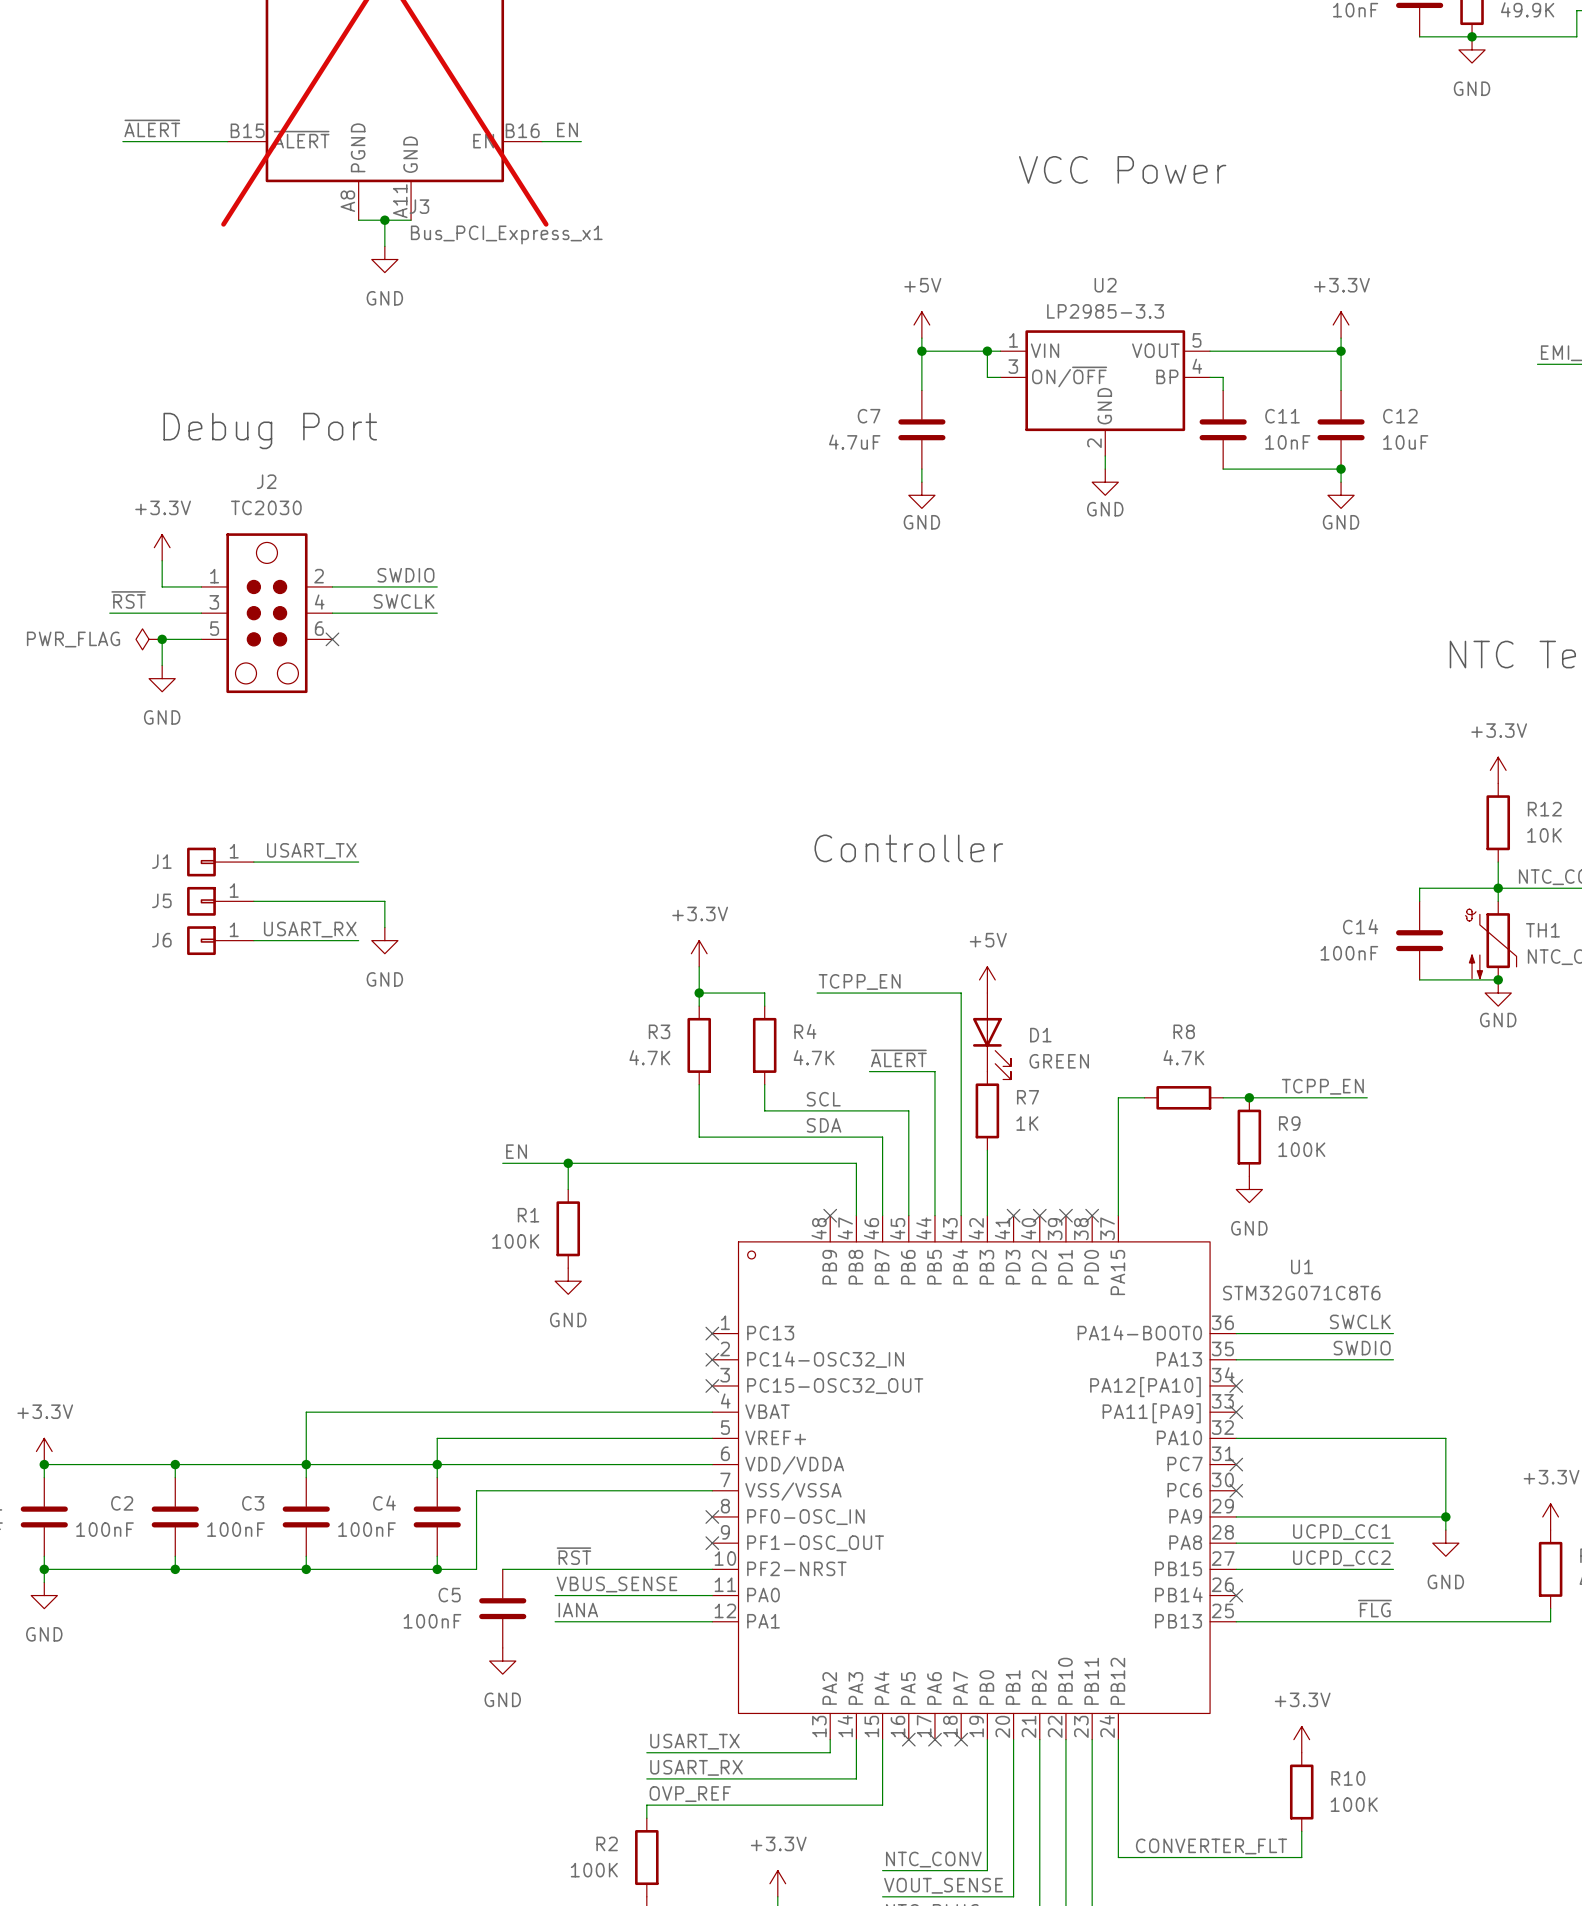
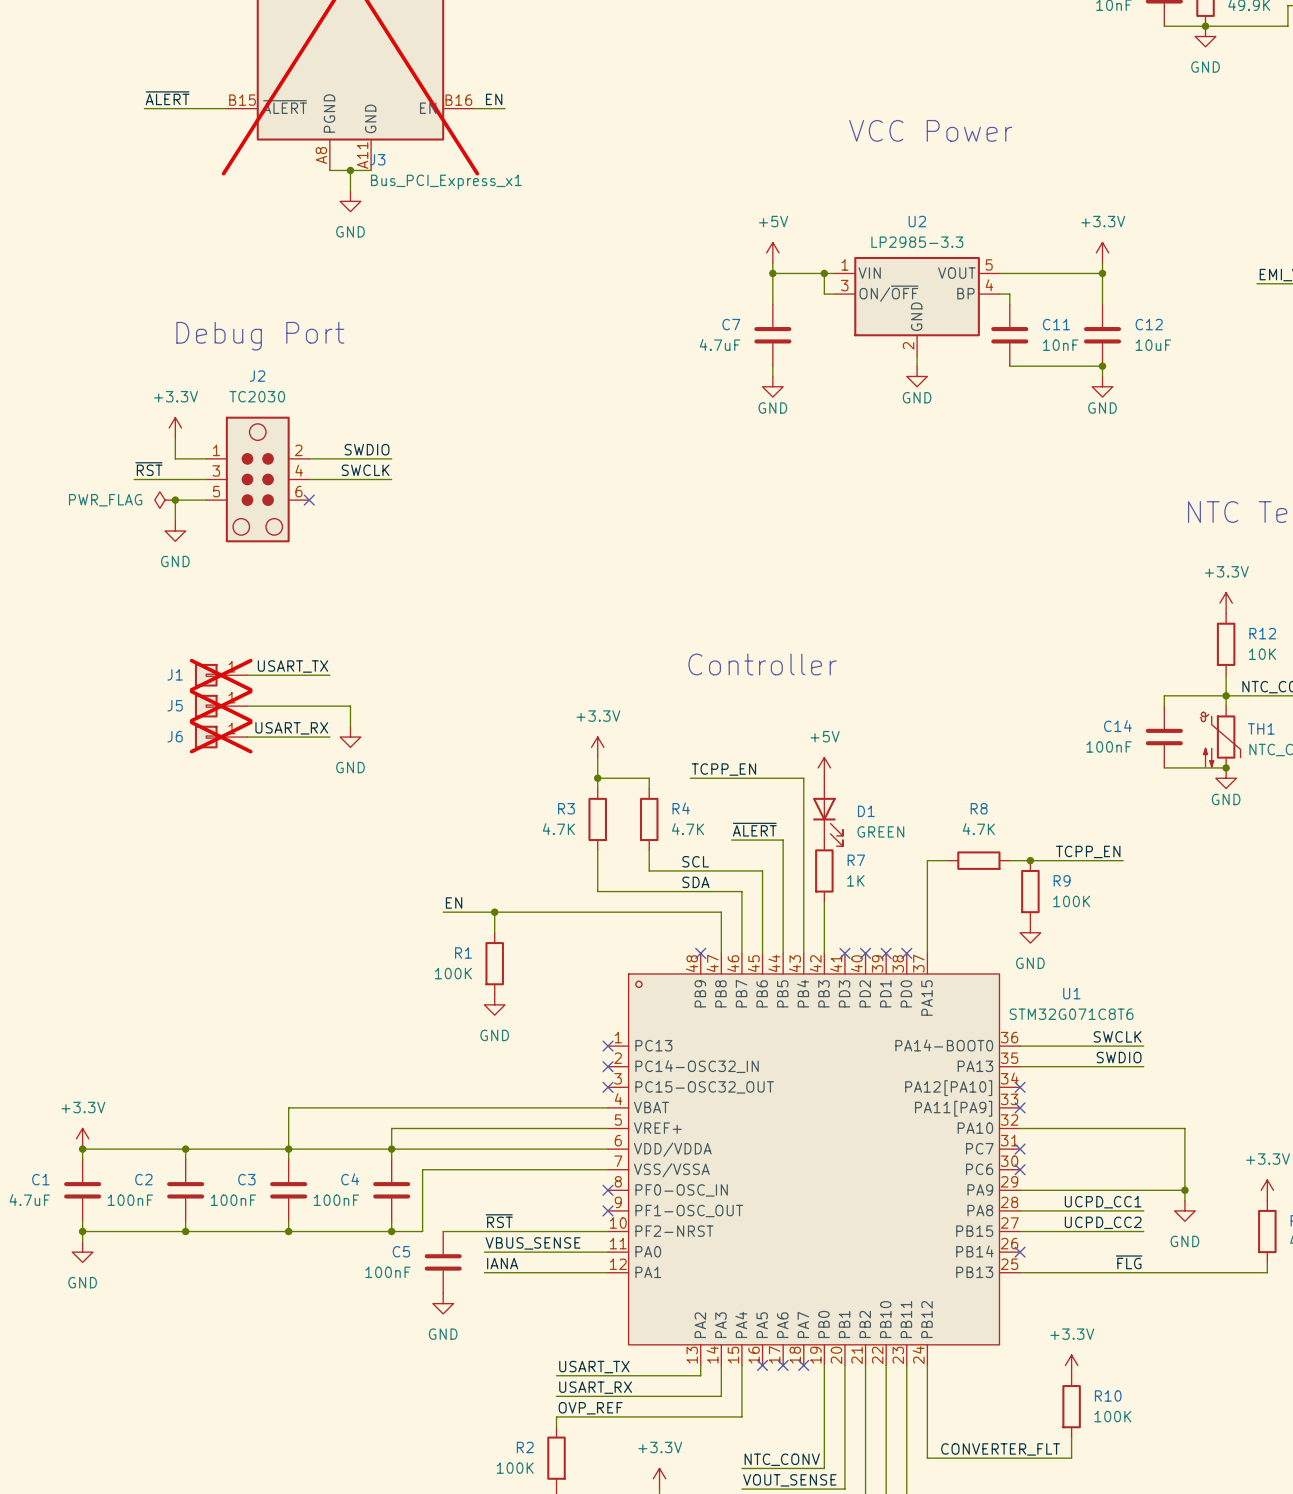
J1 do-not-place cross: none -> (221, 675)
J5 do-not-place cross: none -> (221, 706)
J6 do-not-place cross: none -> (221, 737)

